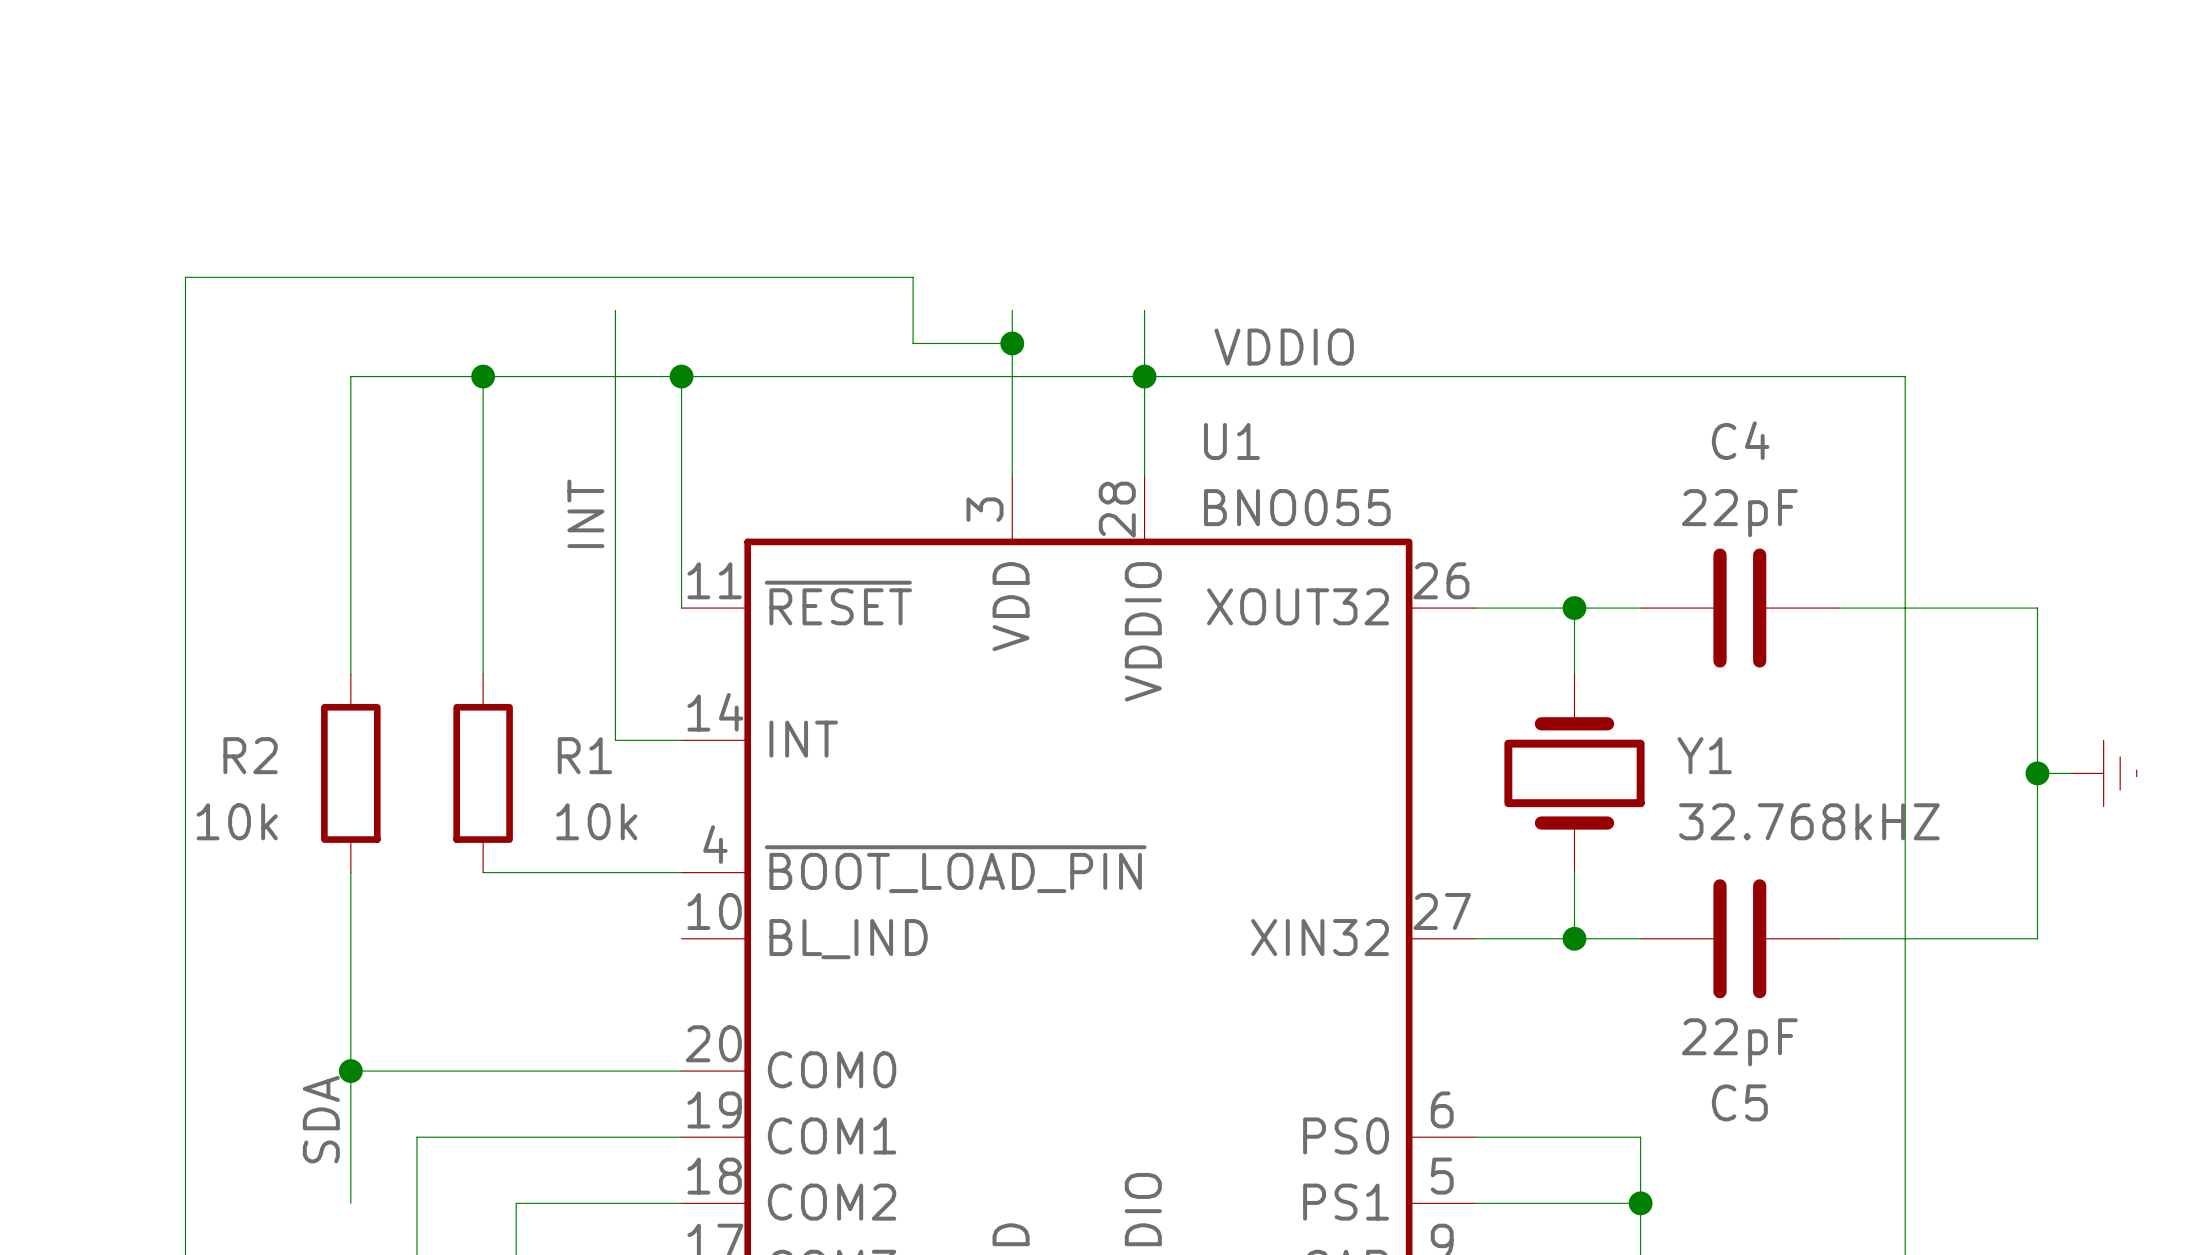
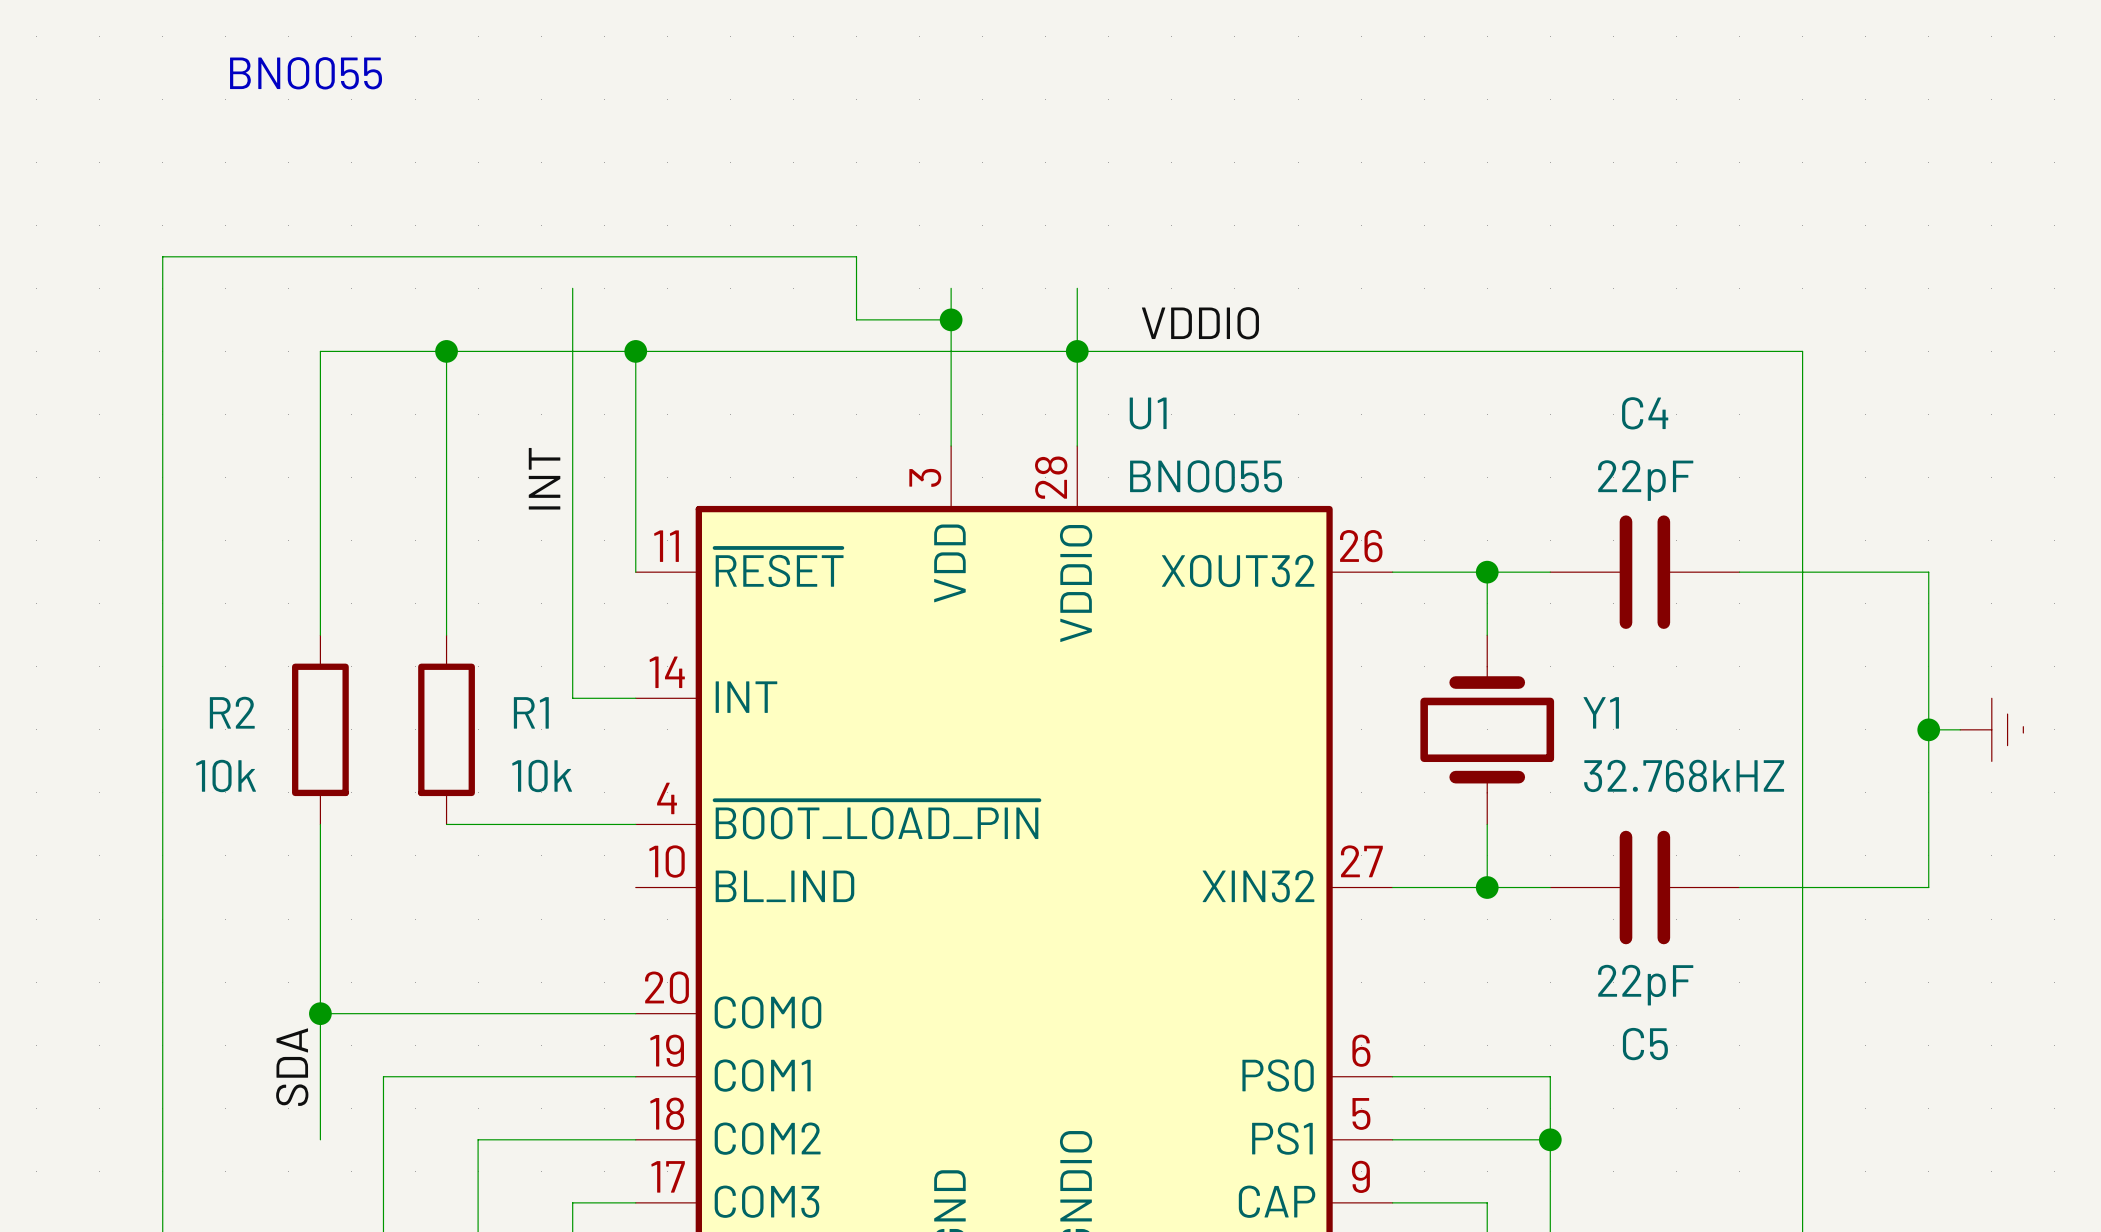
text: none -> BNO055 (306, 73)

